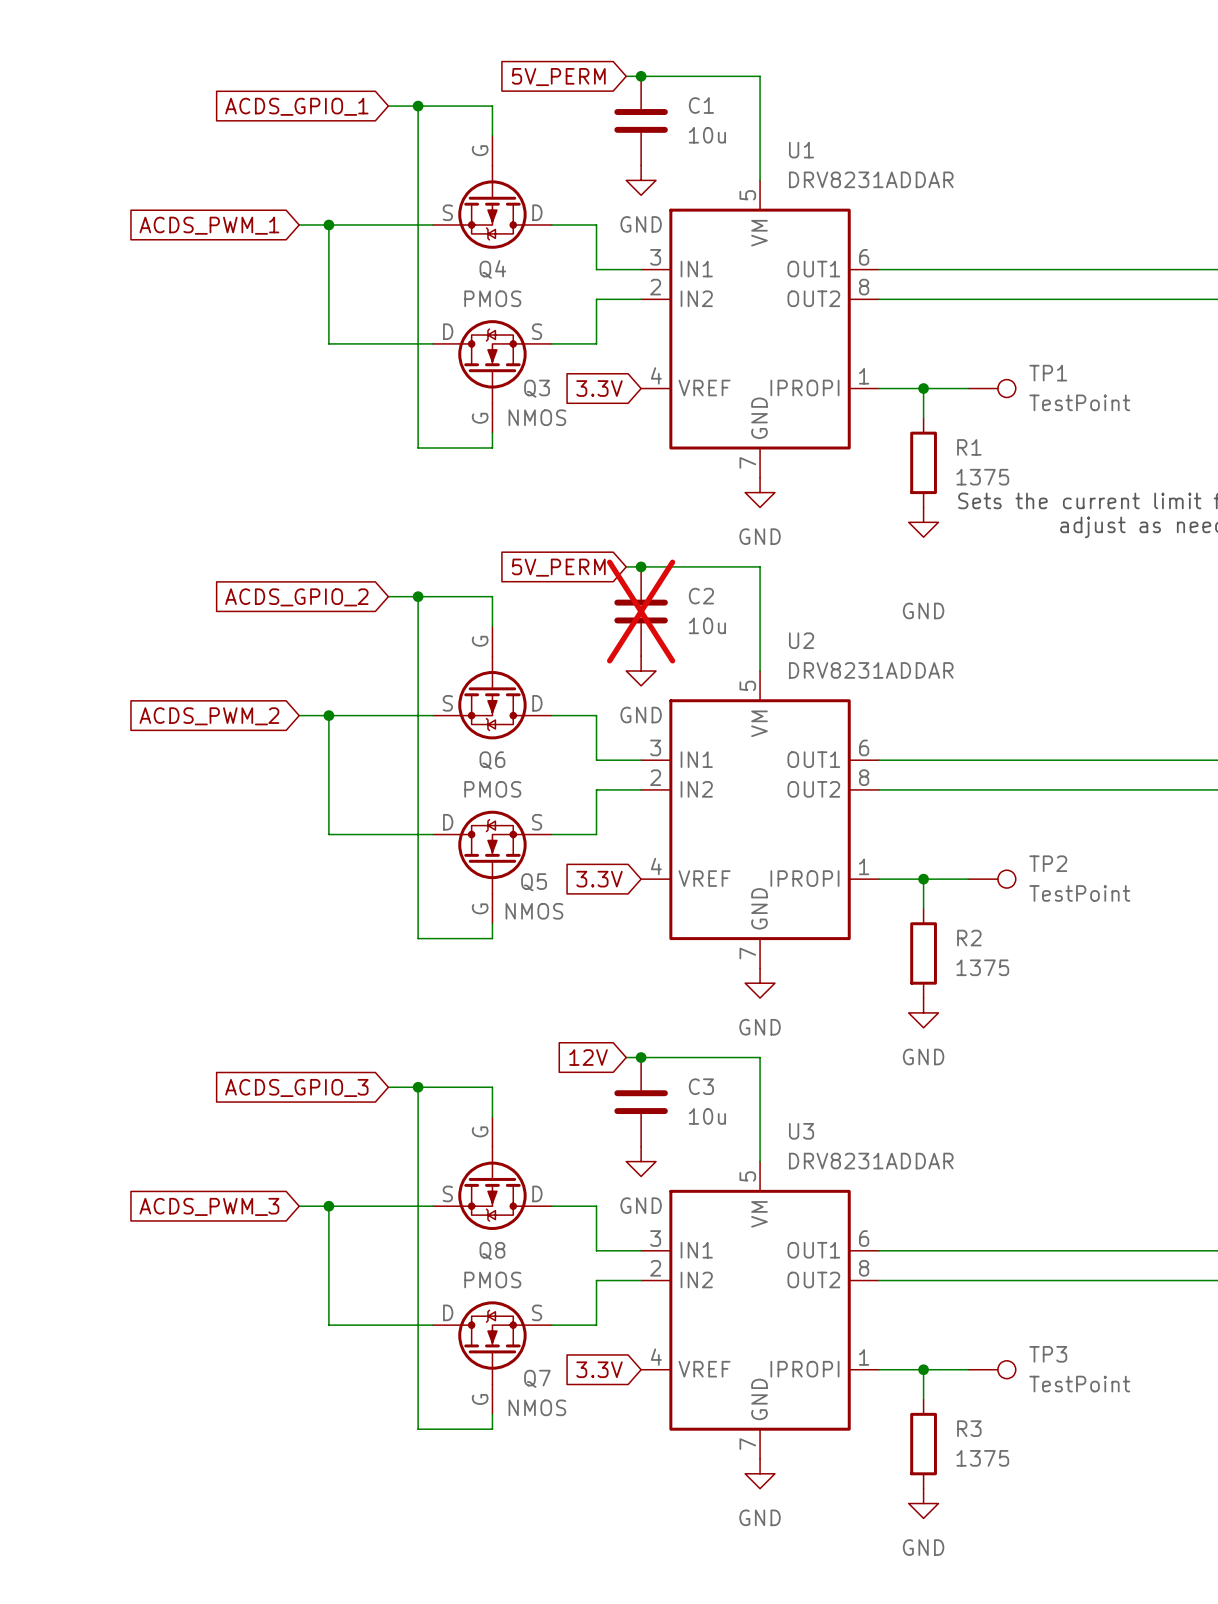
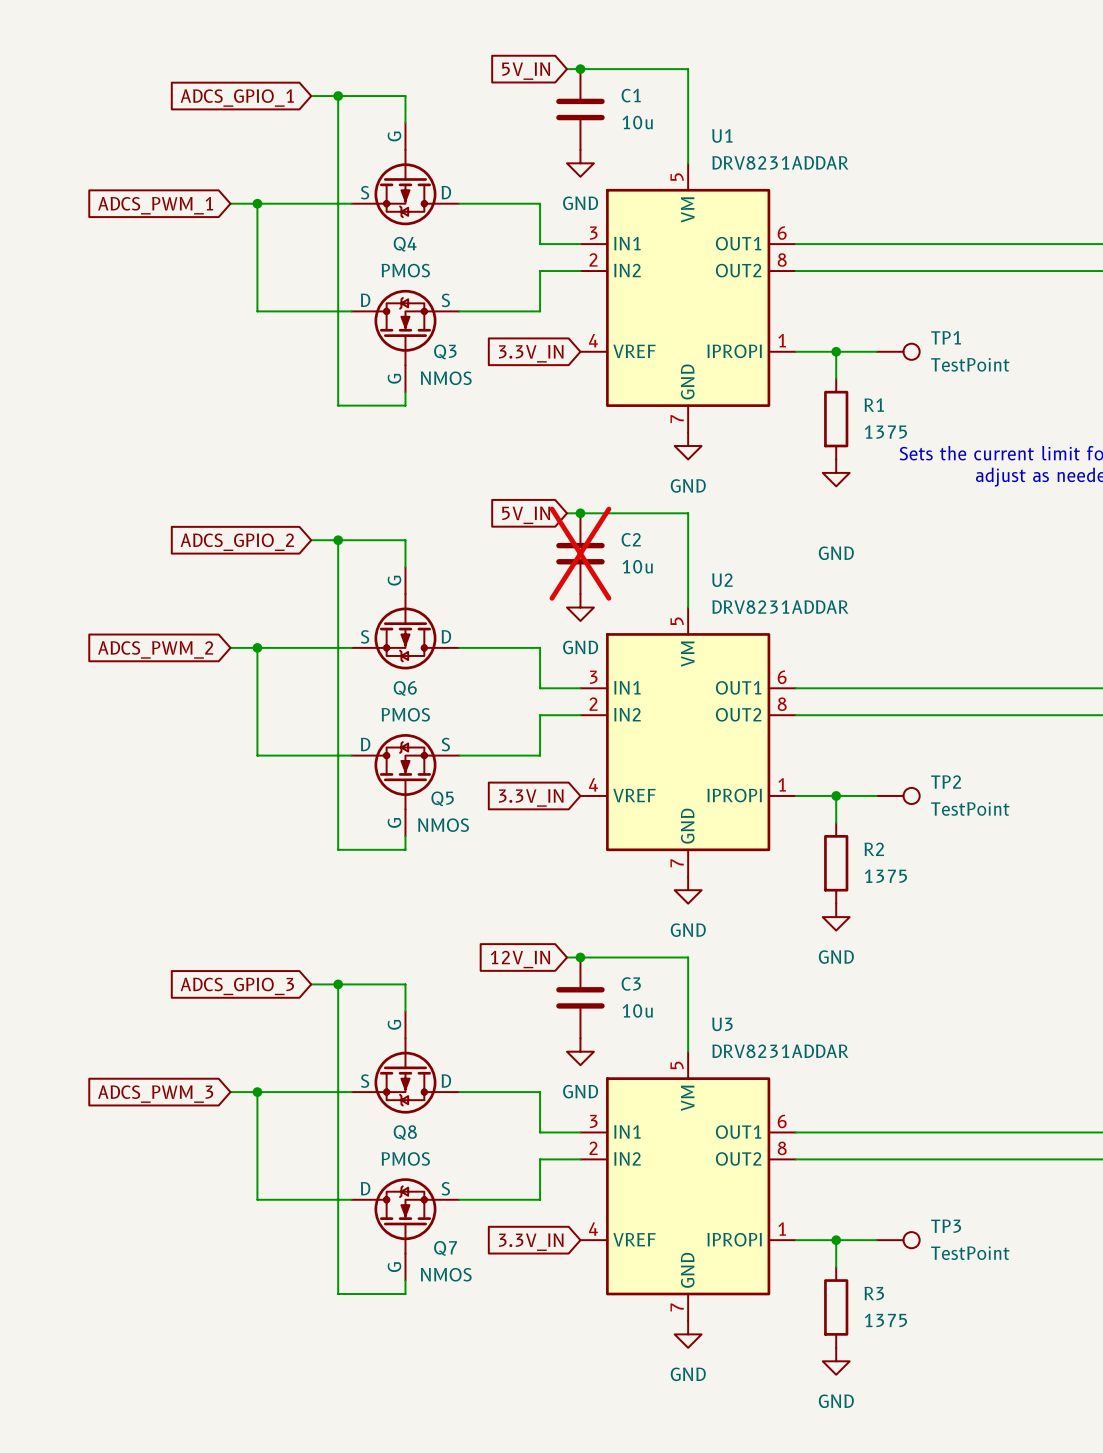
global label: 5V_PERM (558, 77) -> 5V_IN (526, 71)
global label: ACDS_GPIO_1 (296, 106) -> ADCS_GPIO_1 (237, 98)
wire: none -> (311, 96) (351, 96)
wire: (418, 106) (418, 448) -> (338, 96) (338, 405) (378, 405)
junction position: (418, 106) -> (338, 96)
wire: (447, 106) (492, 106) (492, 135) -> (405, 96) (405, 122)
Q4 position: (492, 192) -> (405, 174)
global label: ACDS_PWM_1 (209, 225) -> ADCS_PWM_1 (155, 205)
wire: none -> (230, 203) (270, 203)
wire: (328, 225) (328, 343) -> (257, 203) (257, 311) (297, 311)
junction position: (328, 225) -> (257, 203)
Q3 position: (492, 376) -> (405, 341)
global label: 3.3V (599, 388) -> 3.3V_IN (531, 353)
wire: (492, 433) (492, 448) (447, 448) -> (405, 392) (405, 405)
global label: 5V_PERM (558, 567) -> 5V_IN (526, 515)
wire: none -> (311, 540) (351, 540)
wire: (418, 596) (418, 938) -> (338, 540) (338, 849) (378, 849)
junction position: (418, 596) -> (338, 540)
wire: (447, 596) (492, 596) (492, 626) -> (405, 540) (405, 567)
global label: ACDS_GPIO_2 (296, 597) -> ADCS_GPIO_2 (237, 542)
Q6 position: (492, 682) -> (405, 618)
wire: none -> (230, 647) (270, 647)
wire: (328, 715) (328, 834) -> (257, 647) (257, 755) (297, 755)
junction position: (328, 715) -> (257, 647)
global label: ACDS_PWM_2 (209, 716) -> ADCS_PWM_2 (155, 649)
Q5 position: (492, 867) -> (405, 785)
global label: 3.3V (599, 879) -> 3.3V_IN (531, 797)
wire: (492, 923) (492, 938) (447, 938) -> (405, 836) (405, 849)
global label: 12V (588, 1057) -> 12V_IN (520, 959)
global label: ACDS_GPIO_3 (296, 1087) -> ADCS_GPIO_3 (237, 986)
wire: none -> (311, 984) (351, 984)
wire: (418, 1087) (418, 1429) -> (338, 984) (338, 1294) (378, 1294)
junction position: (418, 1087) -> (338, 984)
wire: (447, 1087) (492, 1087) (492, 1117) -> (405, 984) (405, 1011)
Q8 position: (492, 1173) -> (405, 1062)
global label: ACDS_PWM_3 (209, 1206) -> ADCS_PWM_3 (155, 1094)
wire: none -> (230, 1092) (270, 1092)
wire: (328, 1206) (328, 1325) -> (257, 1092) (257, 1199) (297, 1199)
junction position: (328, 1206) -> (257, 1092)
Q7 position: (492, 1357) -> (405, 1229)
global label: 3.3V (599, 1369) -> 3.3V_IN (531, 1242)
wire: (492, 1414) (492, 1429) (447, 1429) -> (405, 1280) (405, 1294)

